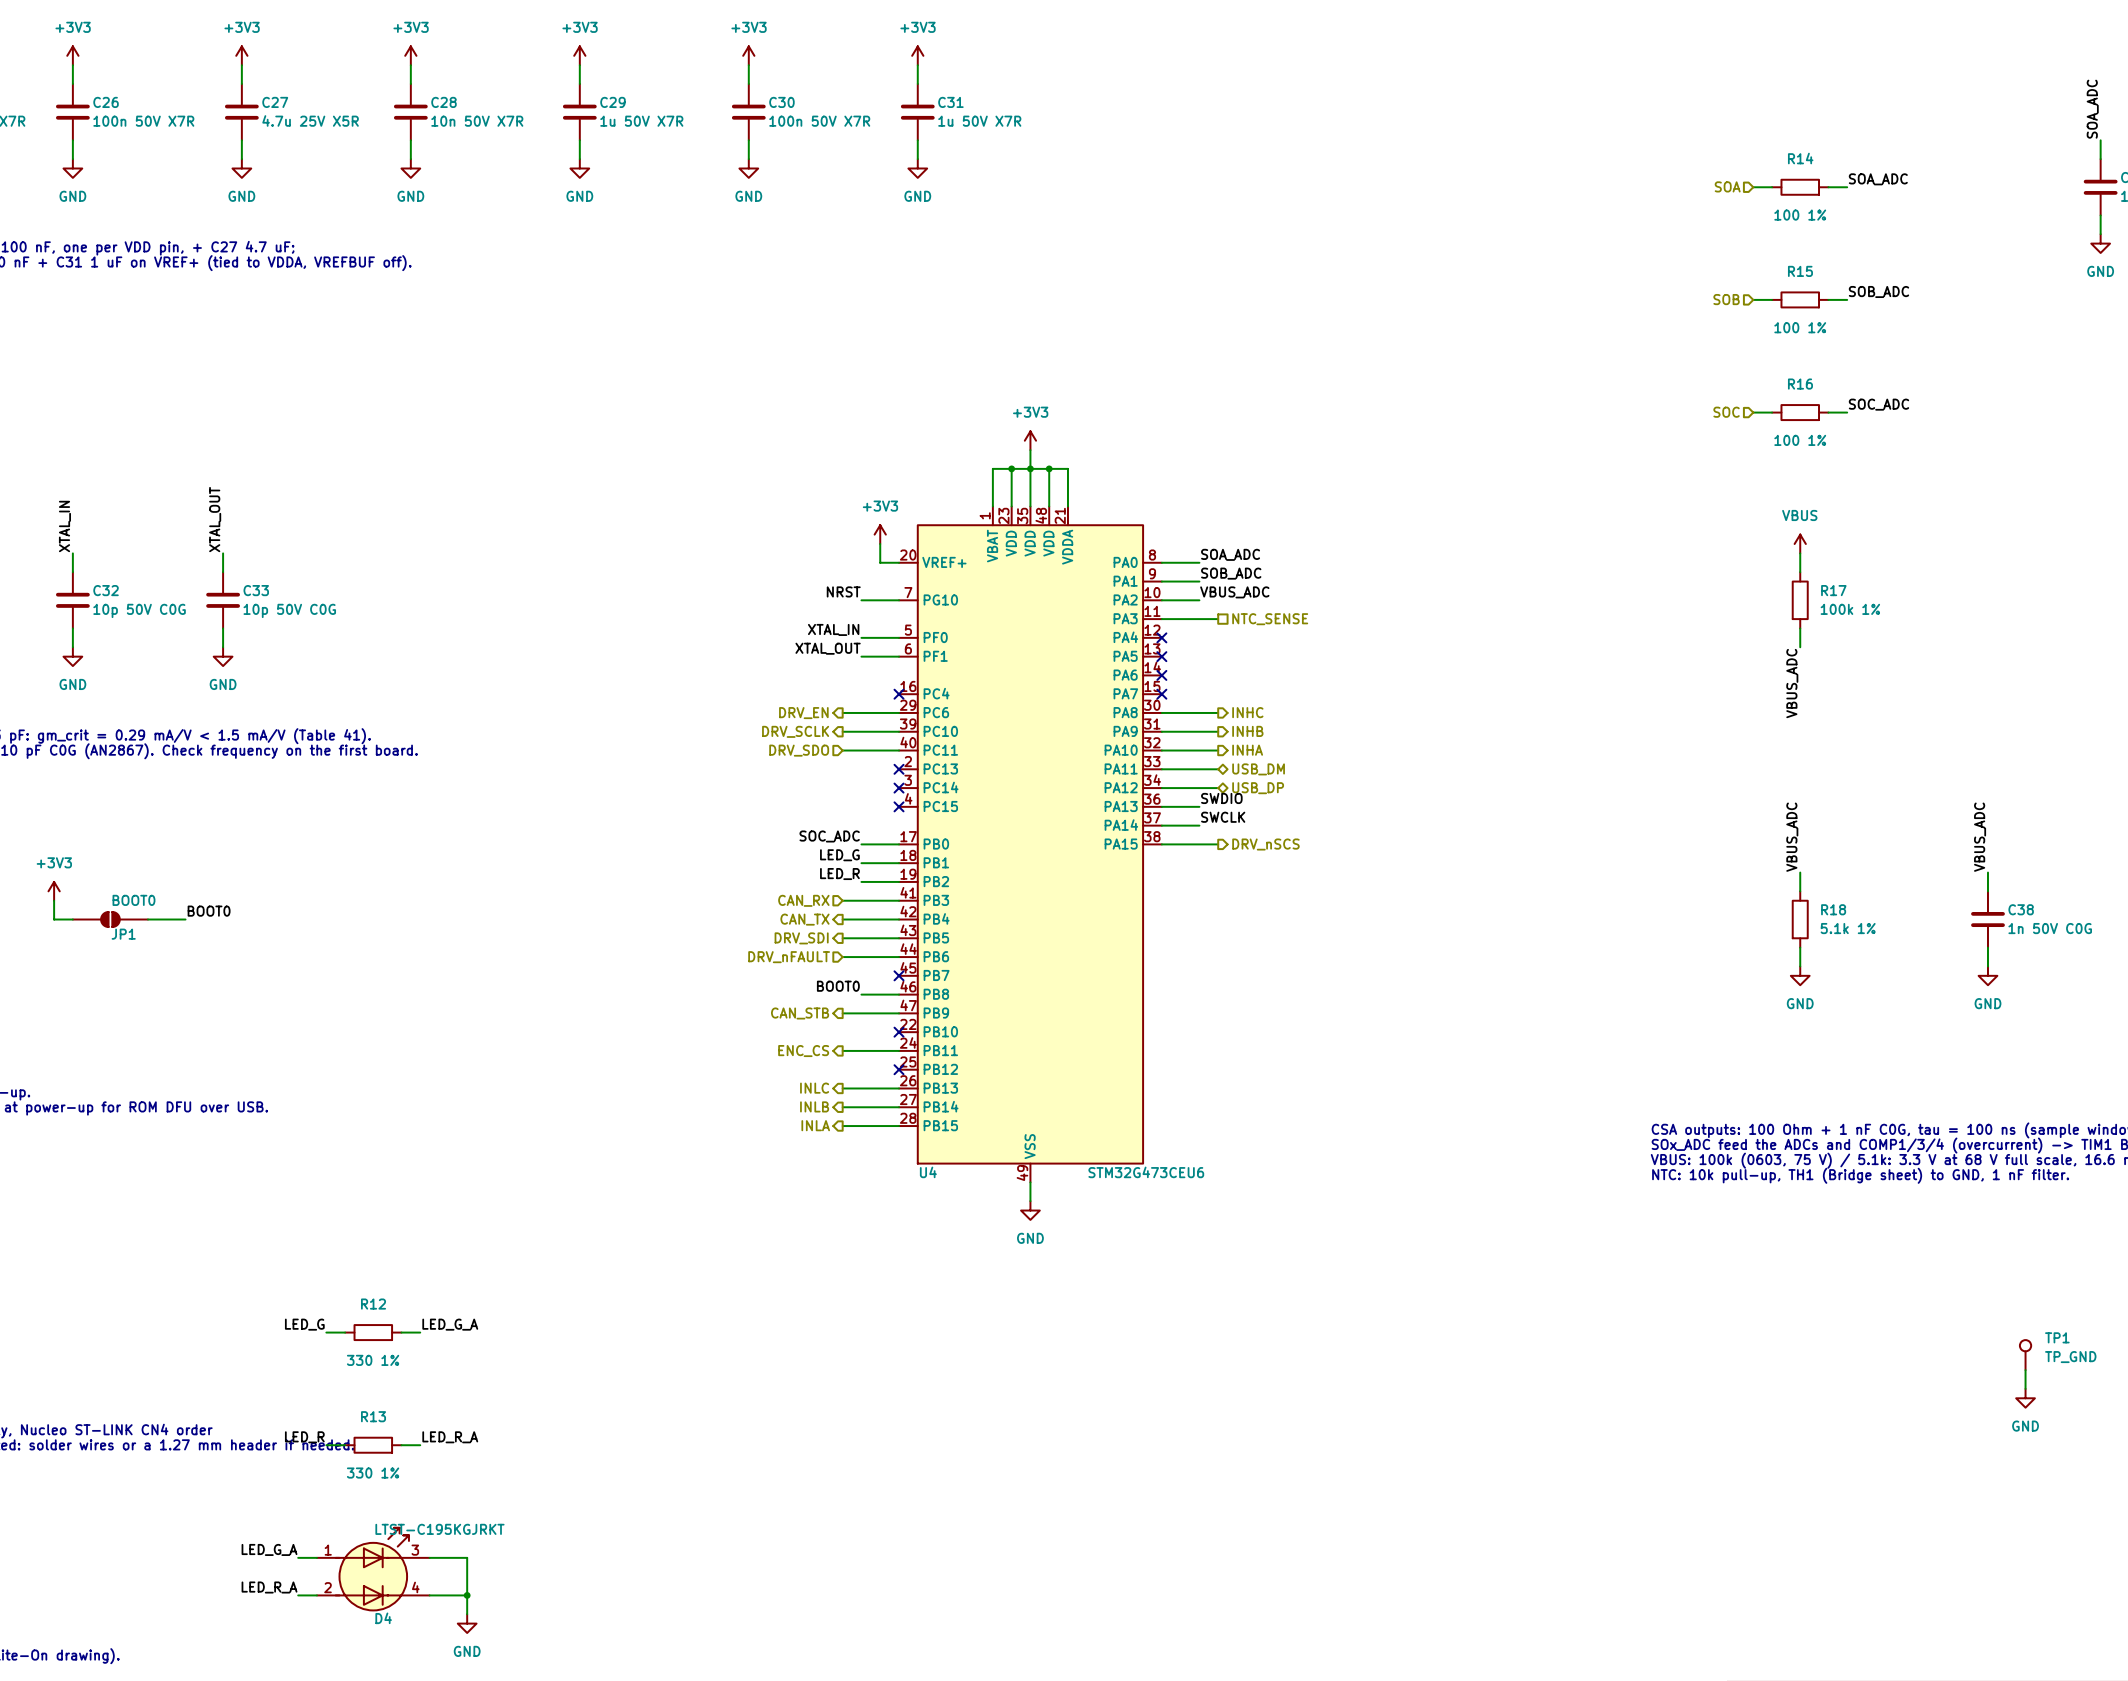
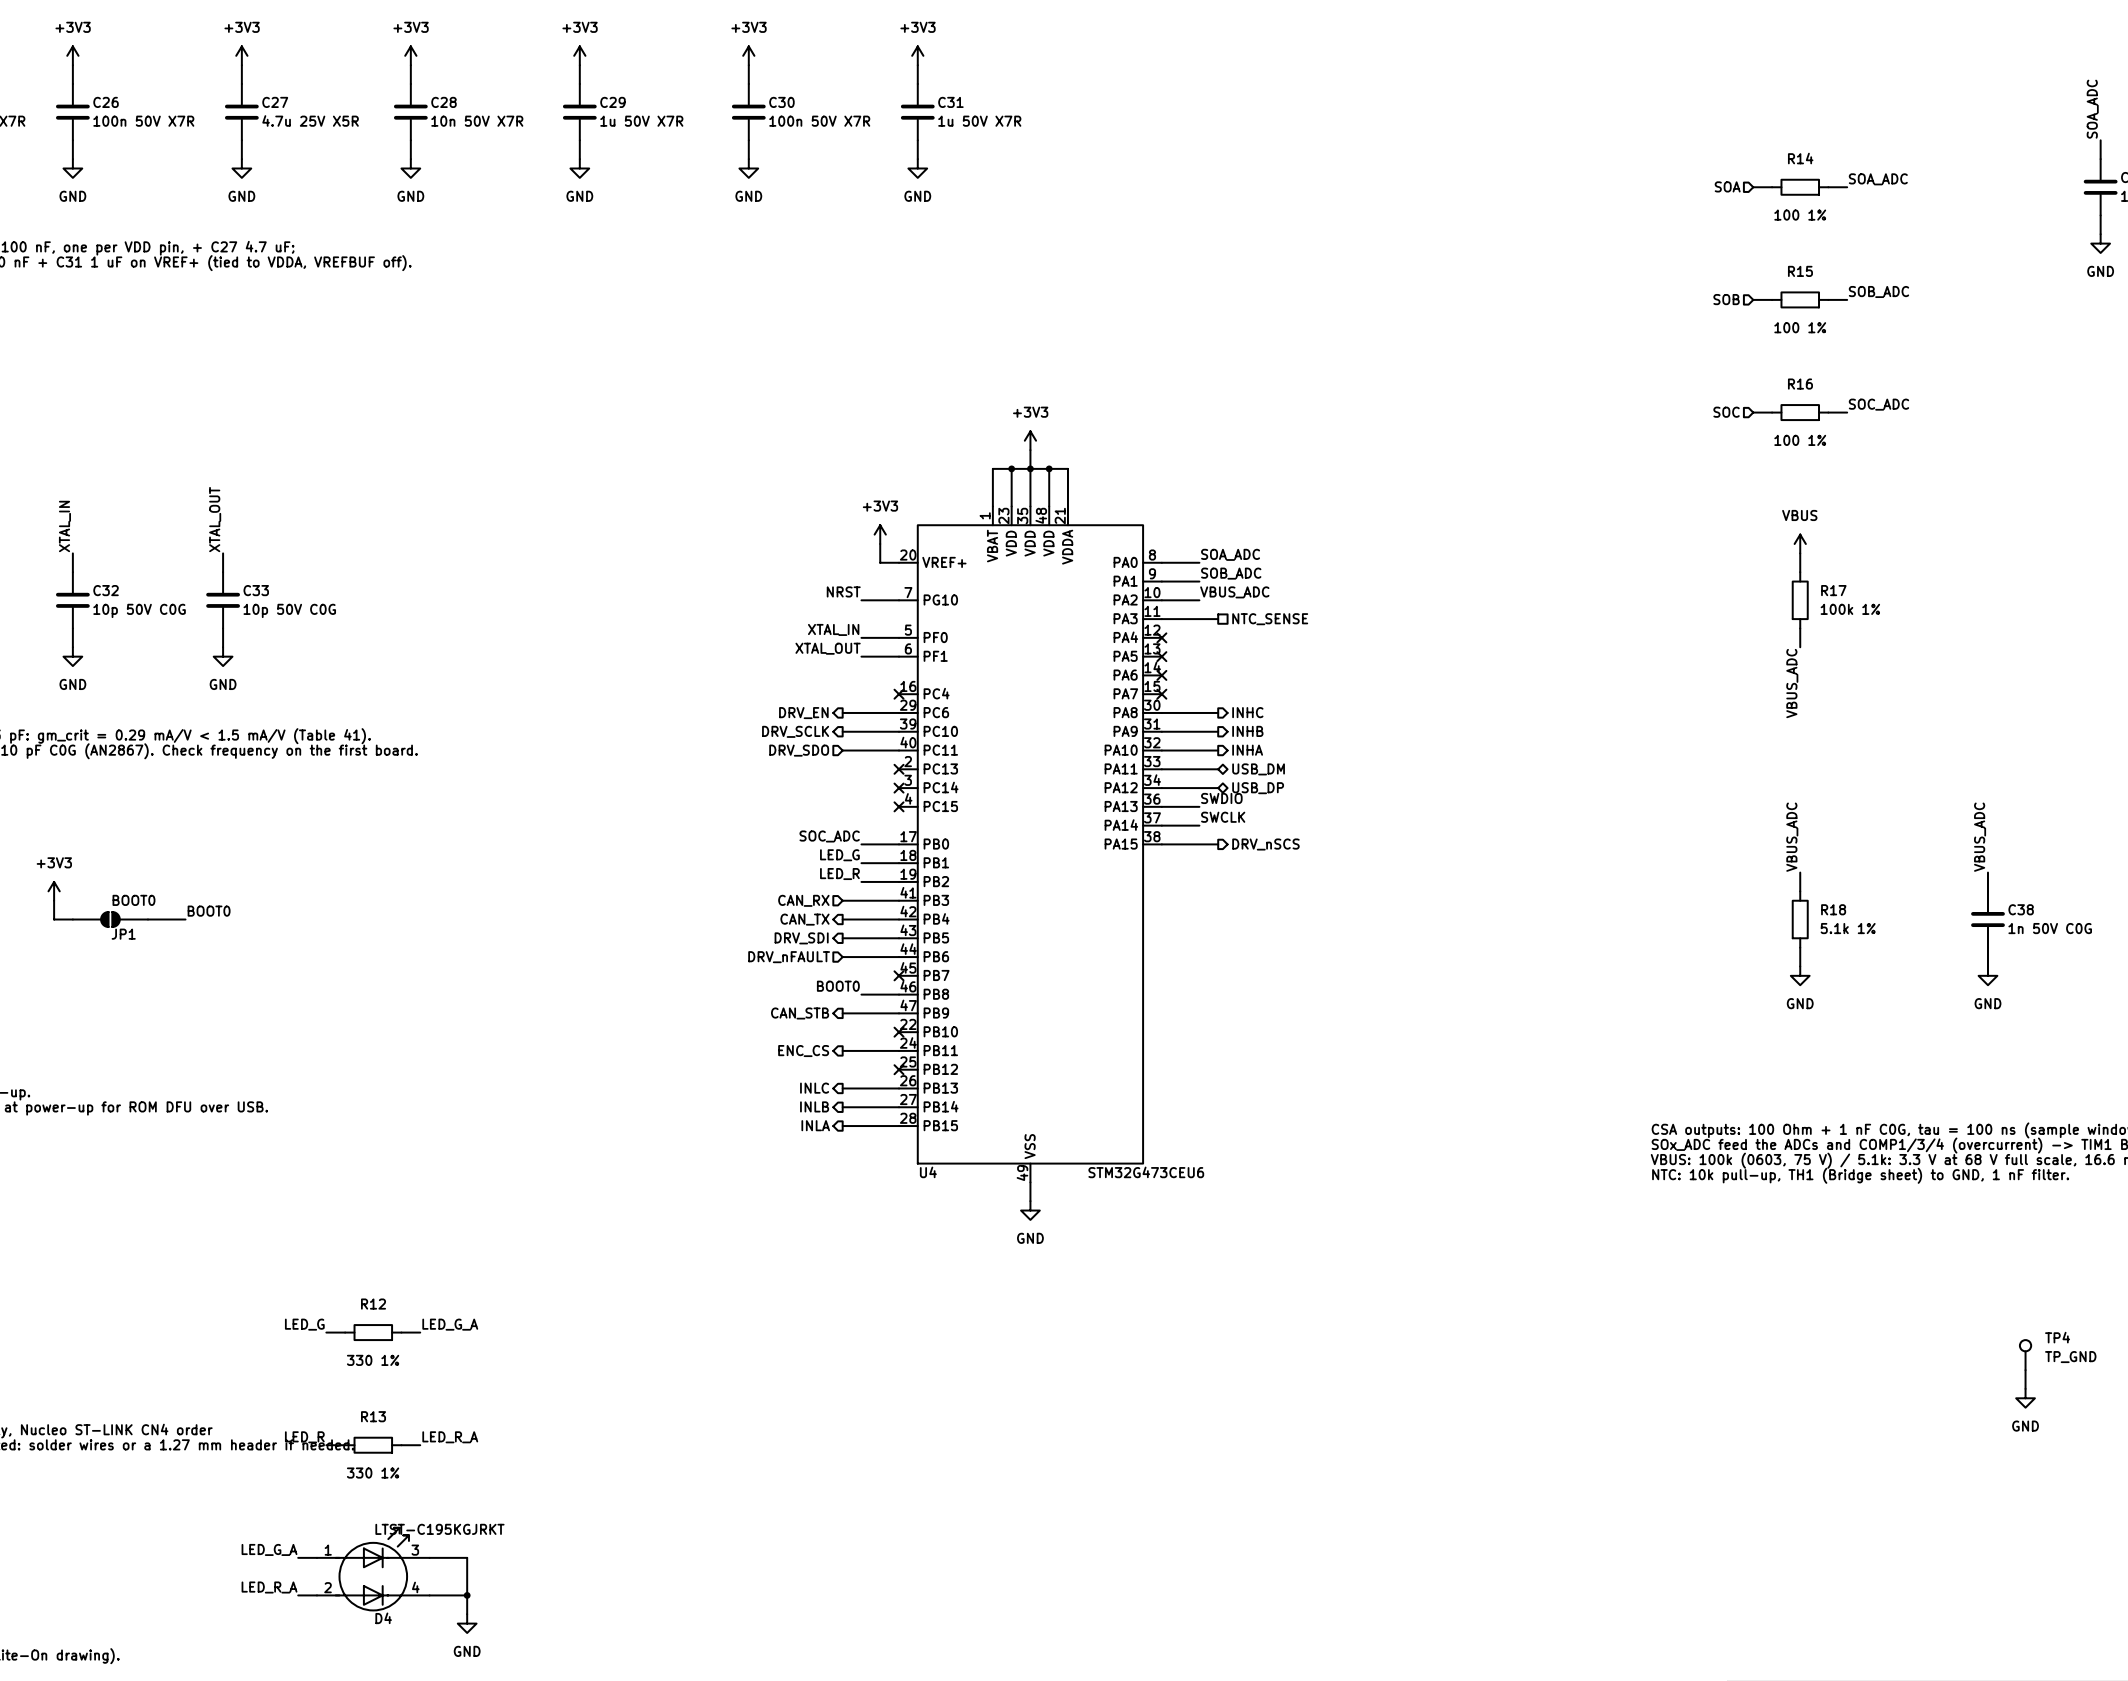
TP1 name: TP1 (2057, 1337) -> TP4 (2057, 1337)

